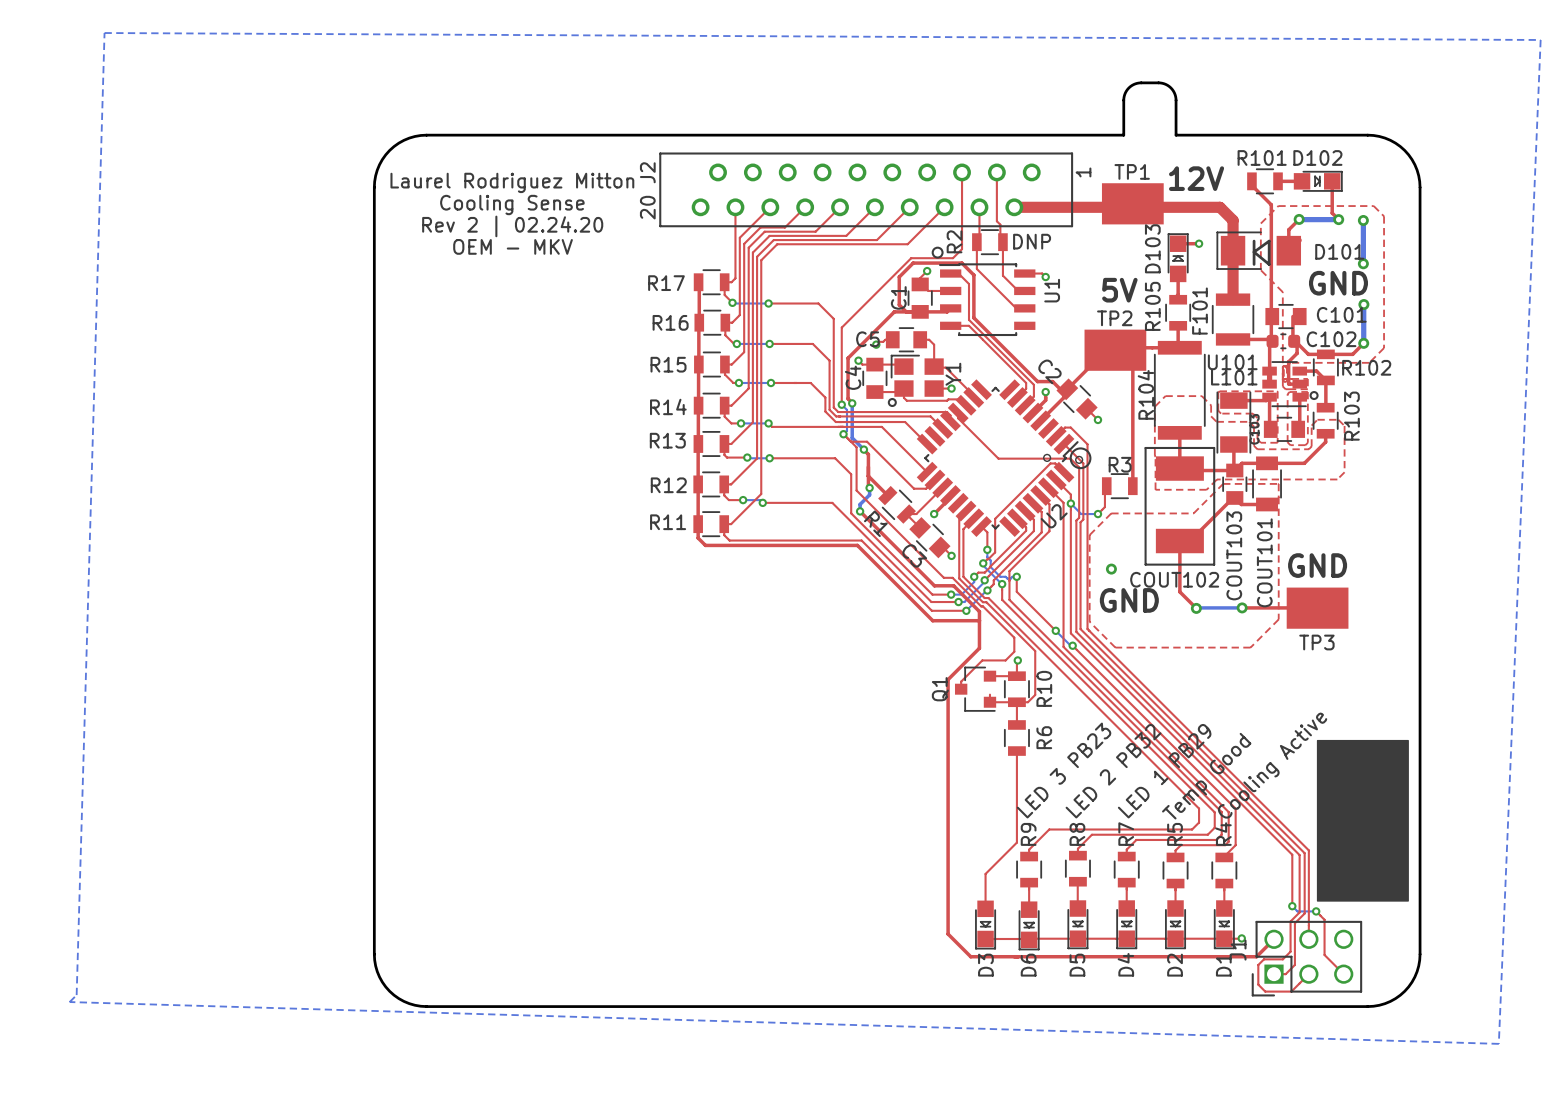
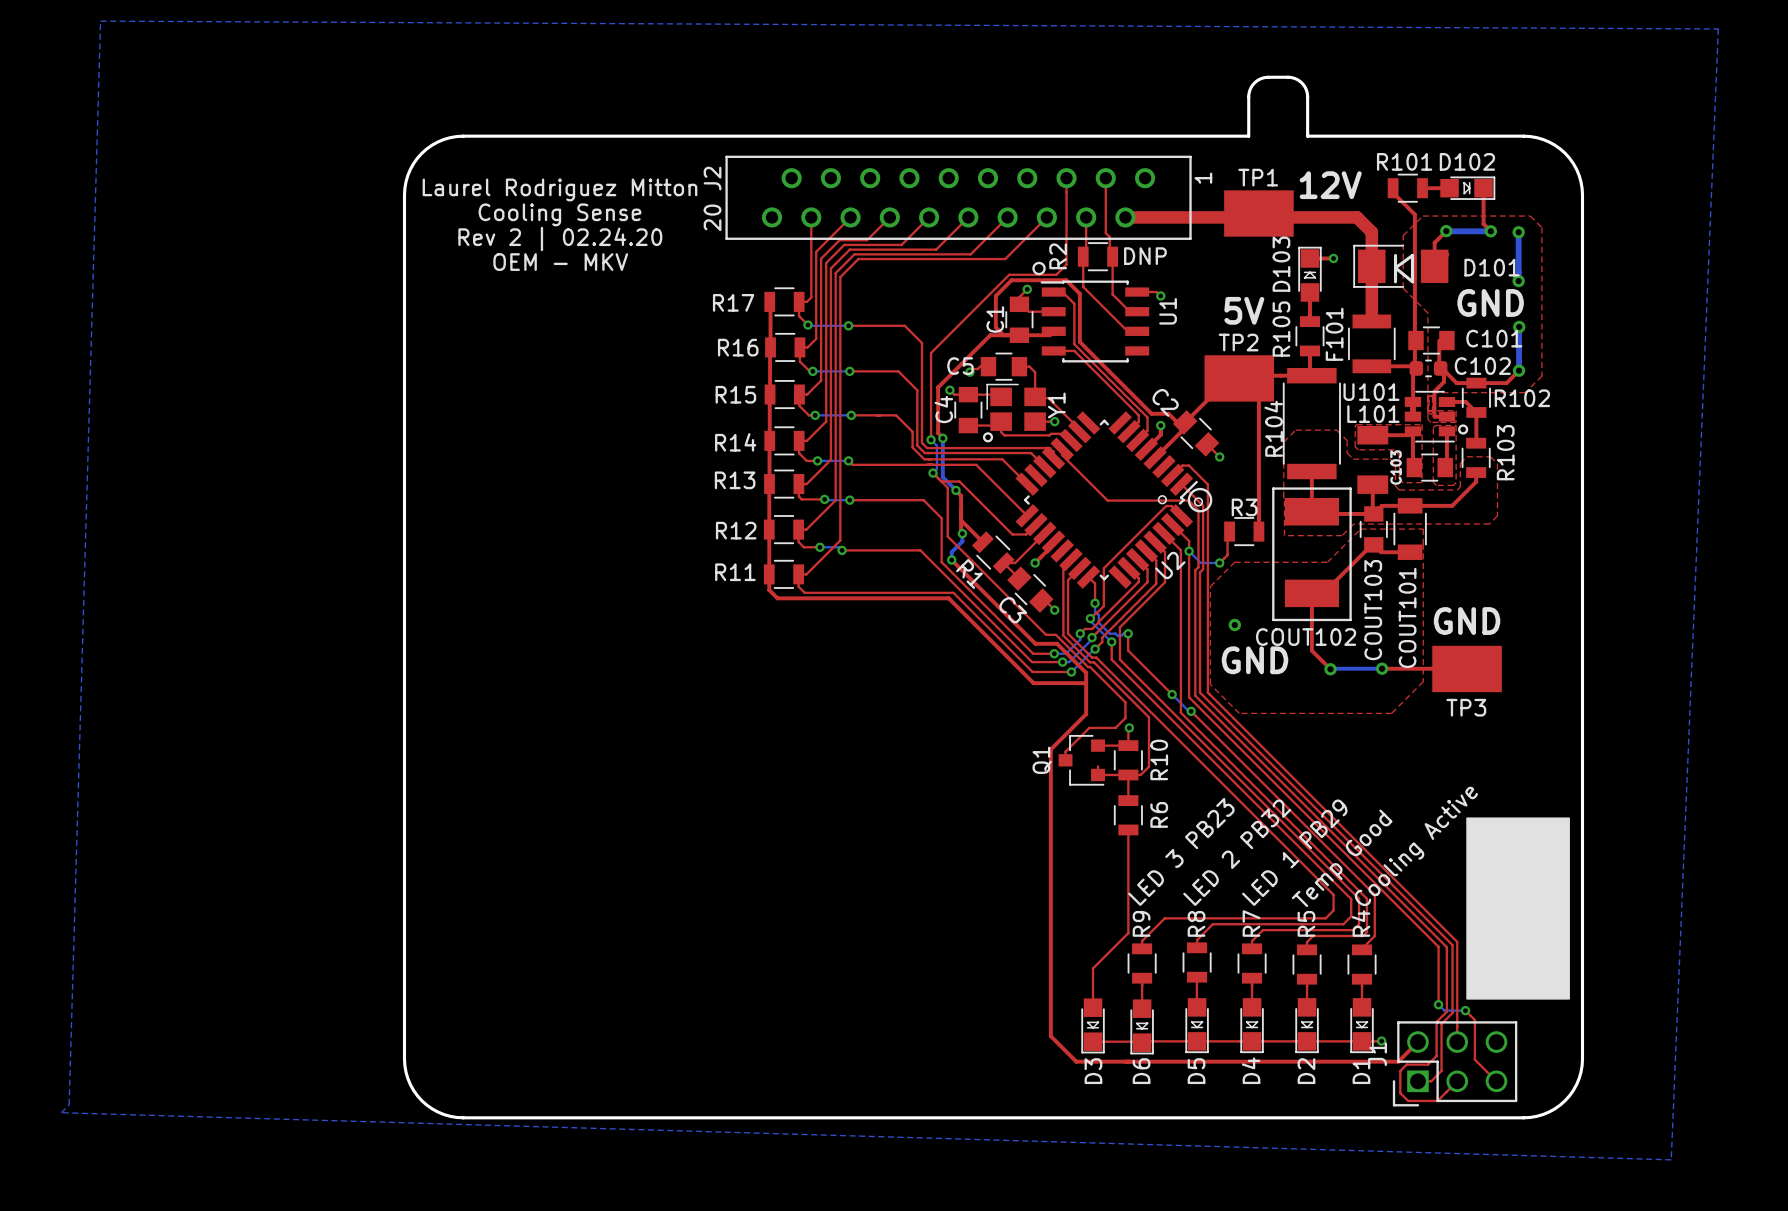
L101 footprint: [1216, 391, 1252, 454] -> [1357, 425, 1389, 494]

